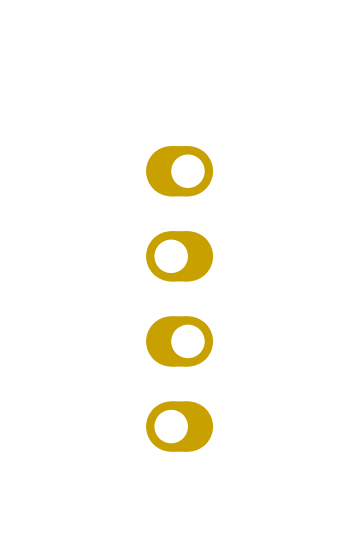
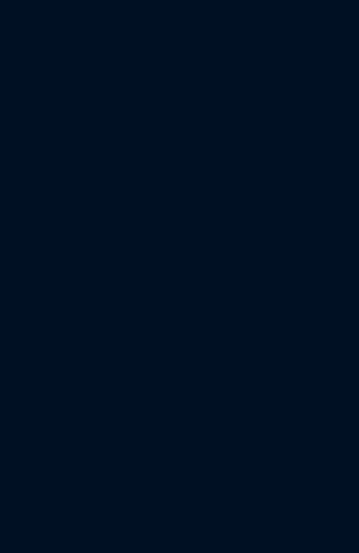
part: (179, 298) -> none

